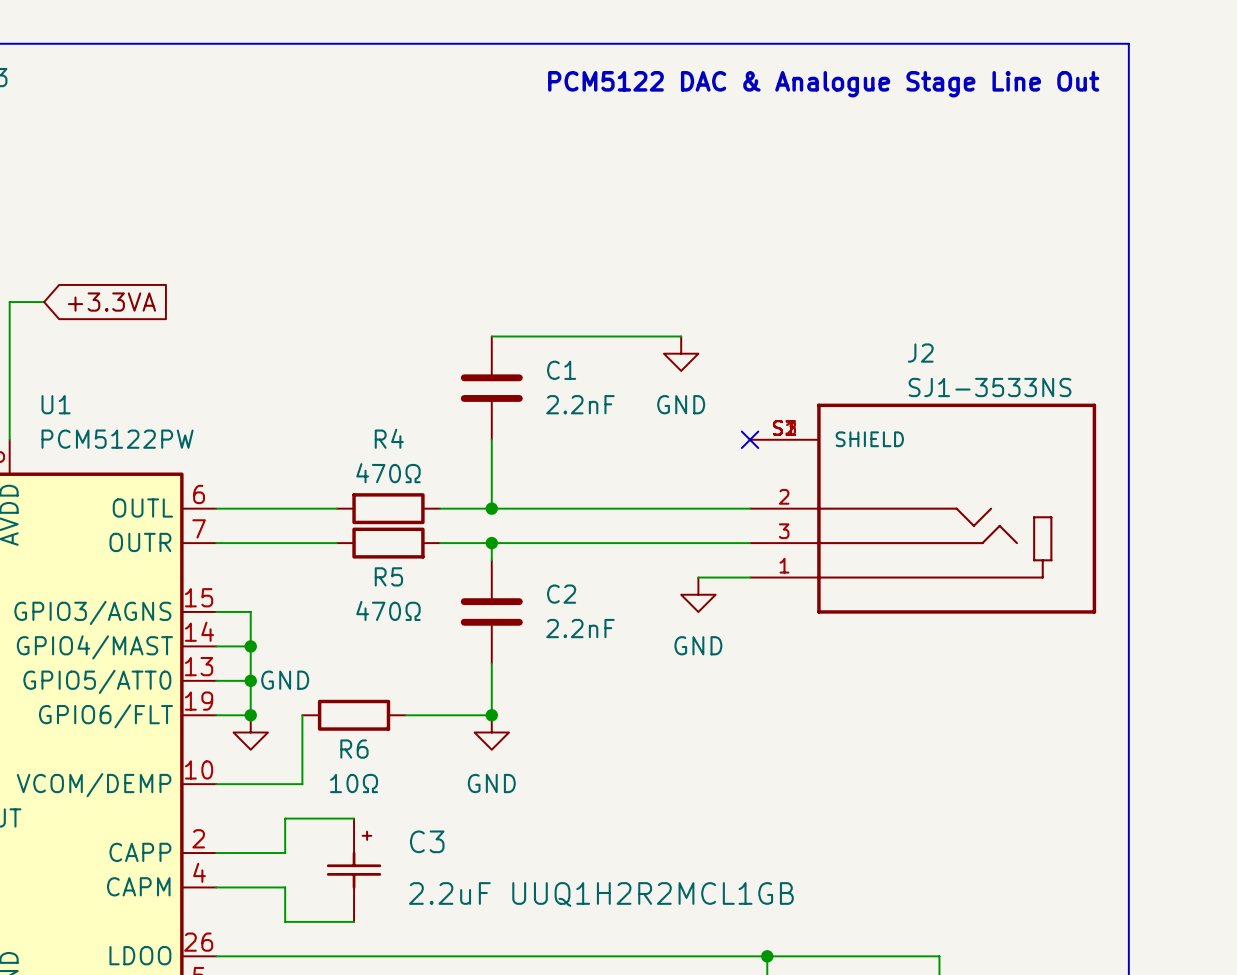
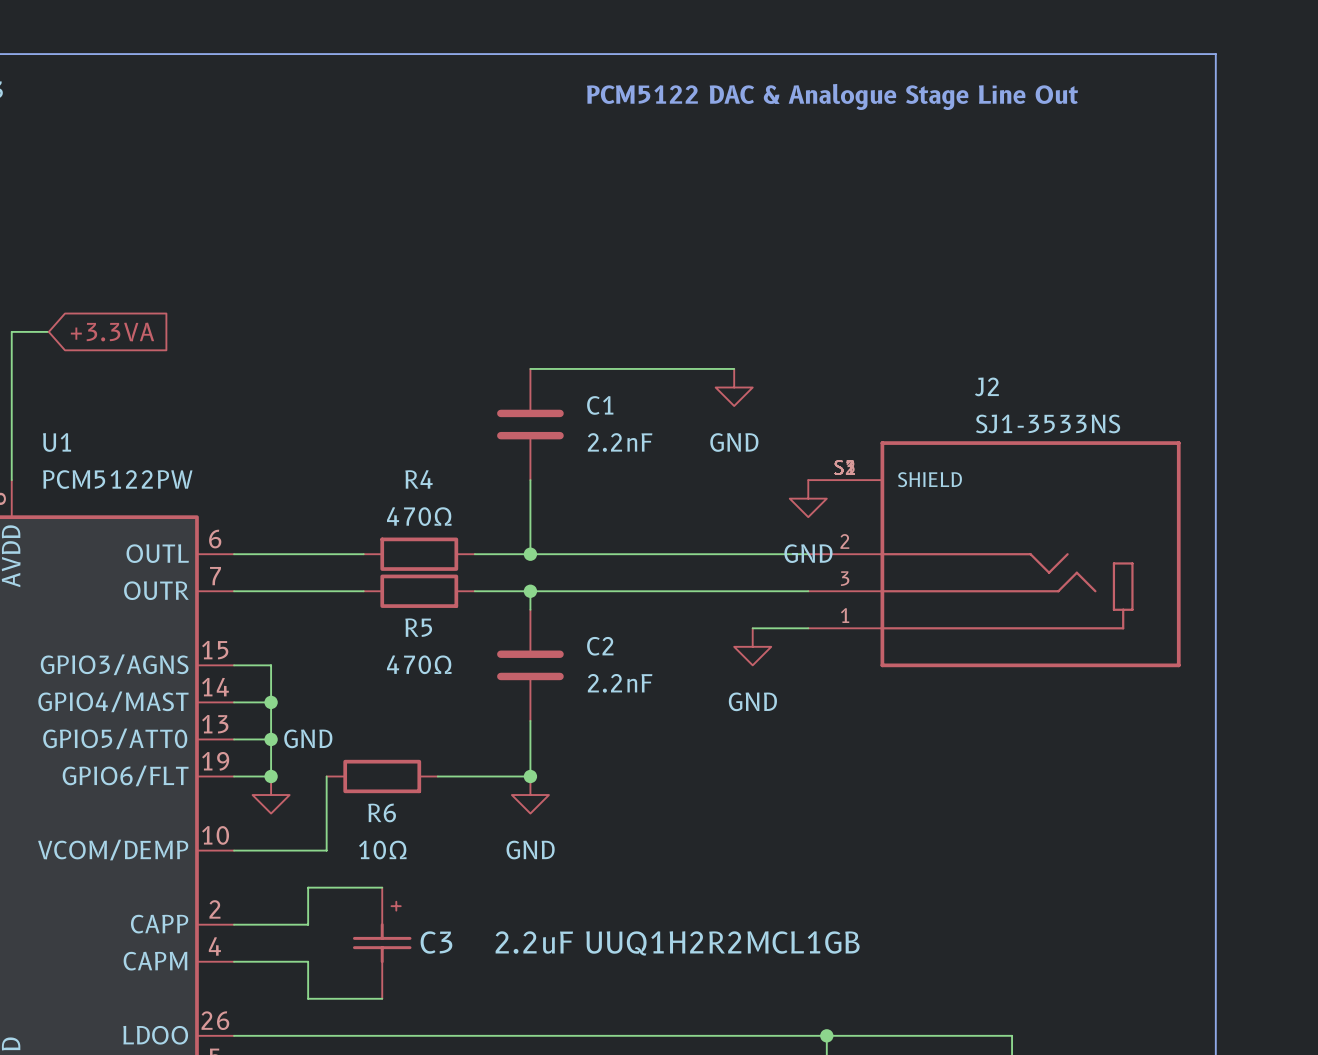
no-connect mark: (750, 439) -> none
power symbol: none -> GND (808, 498)
C3 name position: C3 (427, 841) -> C3 (436, 942)
C3 value position: 2.2uF UUQ1H2R2MCL1GB (601, 894) -> 2.2uF UUQ1H2R2MCL1GB (677, 943)

